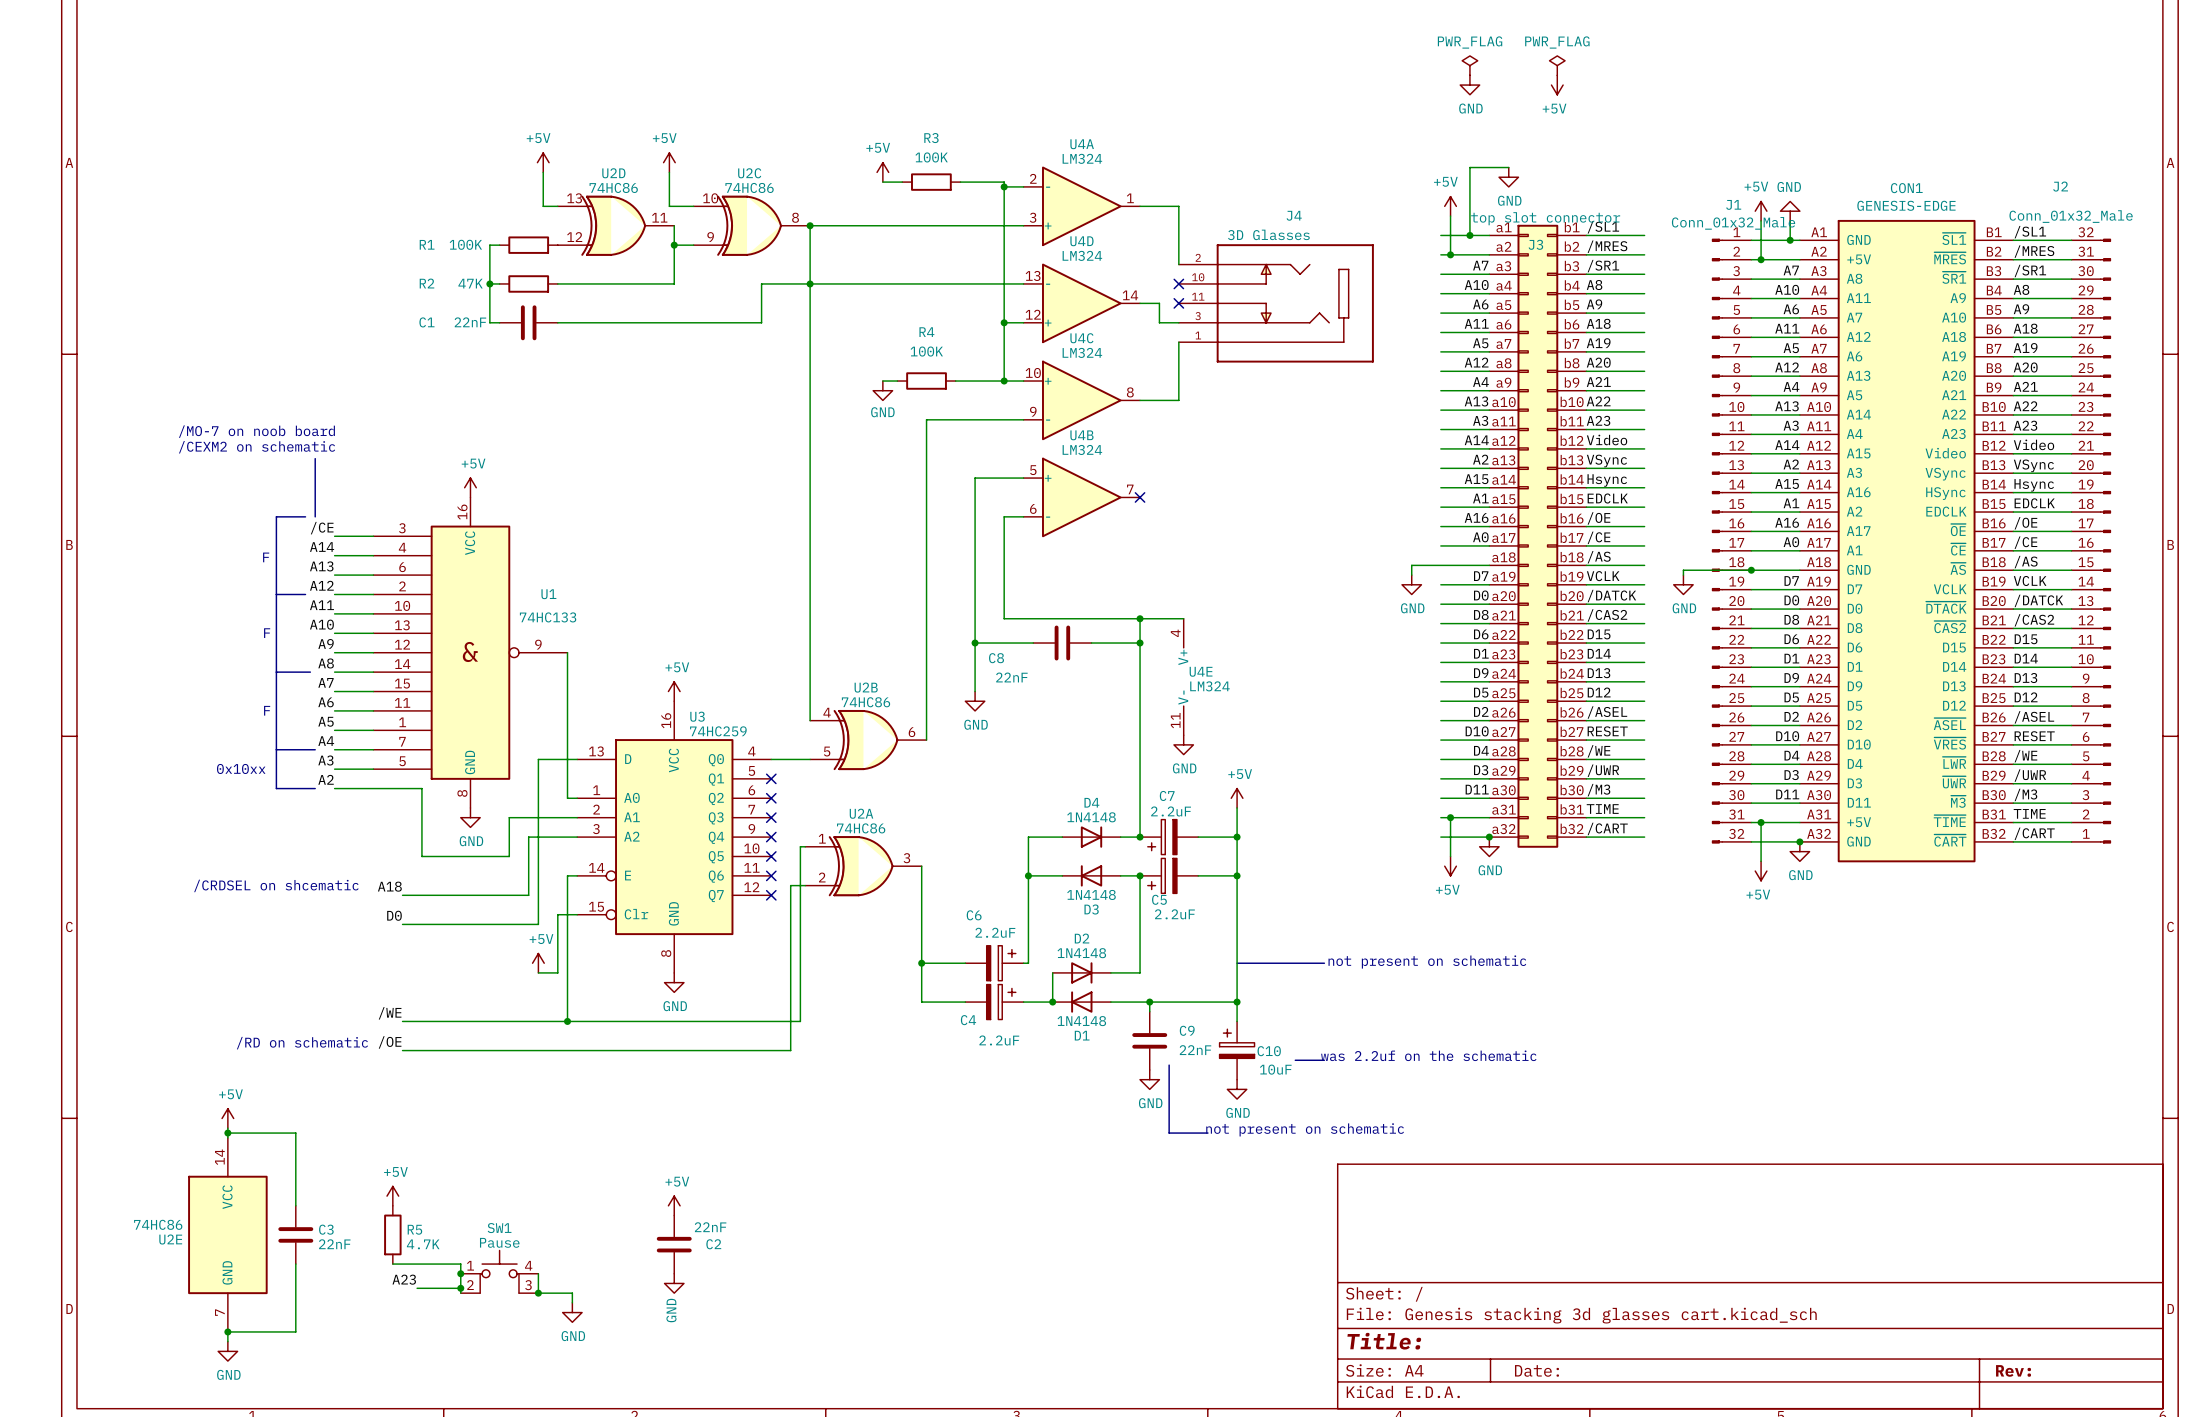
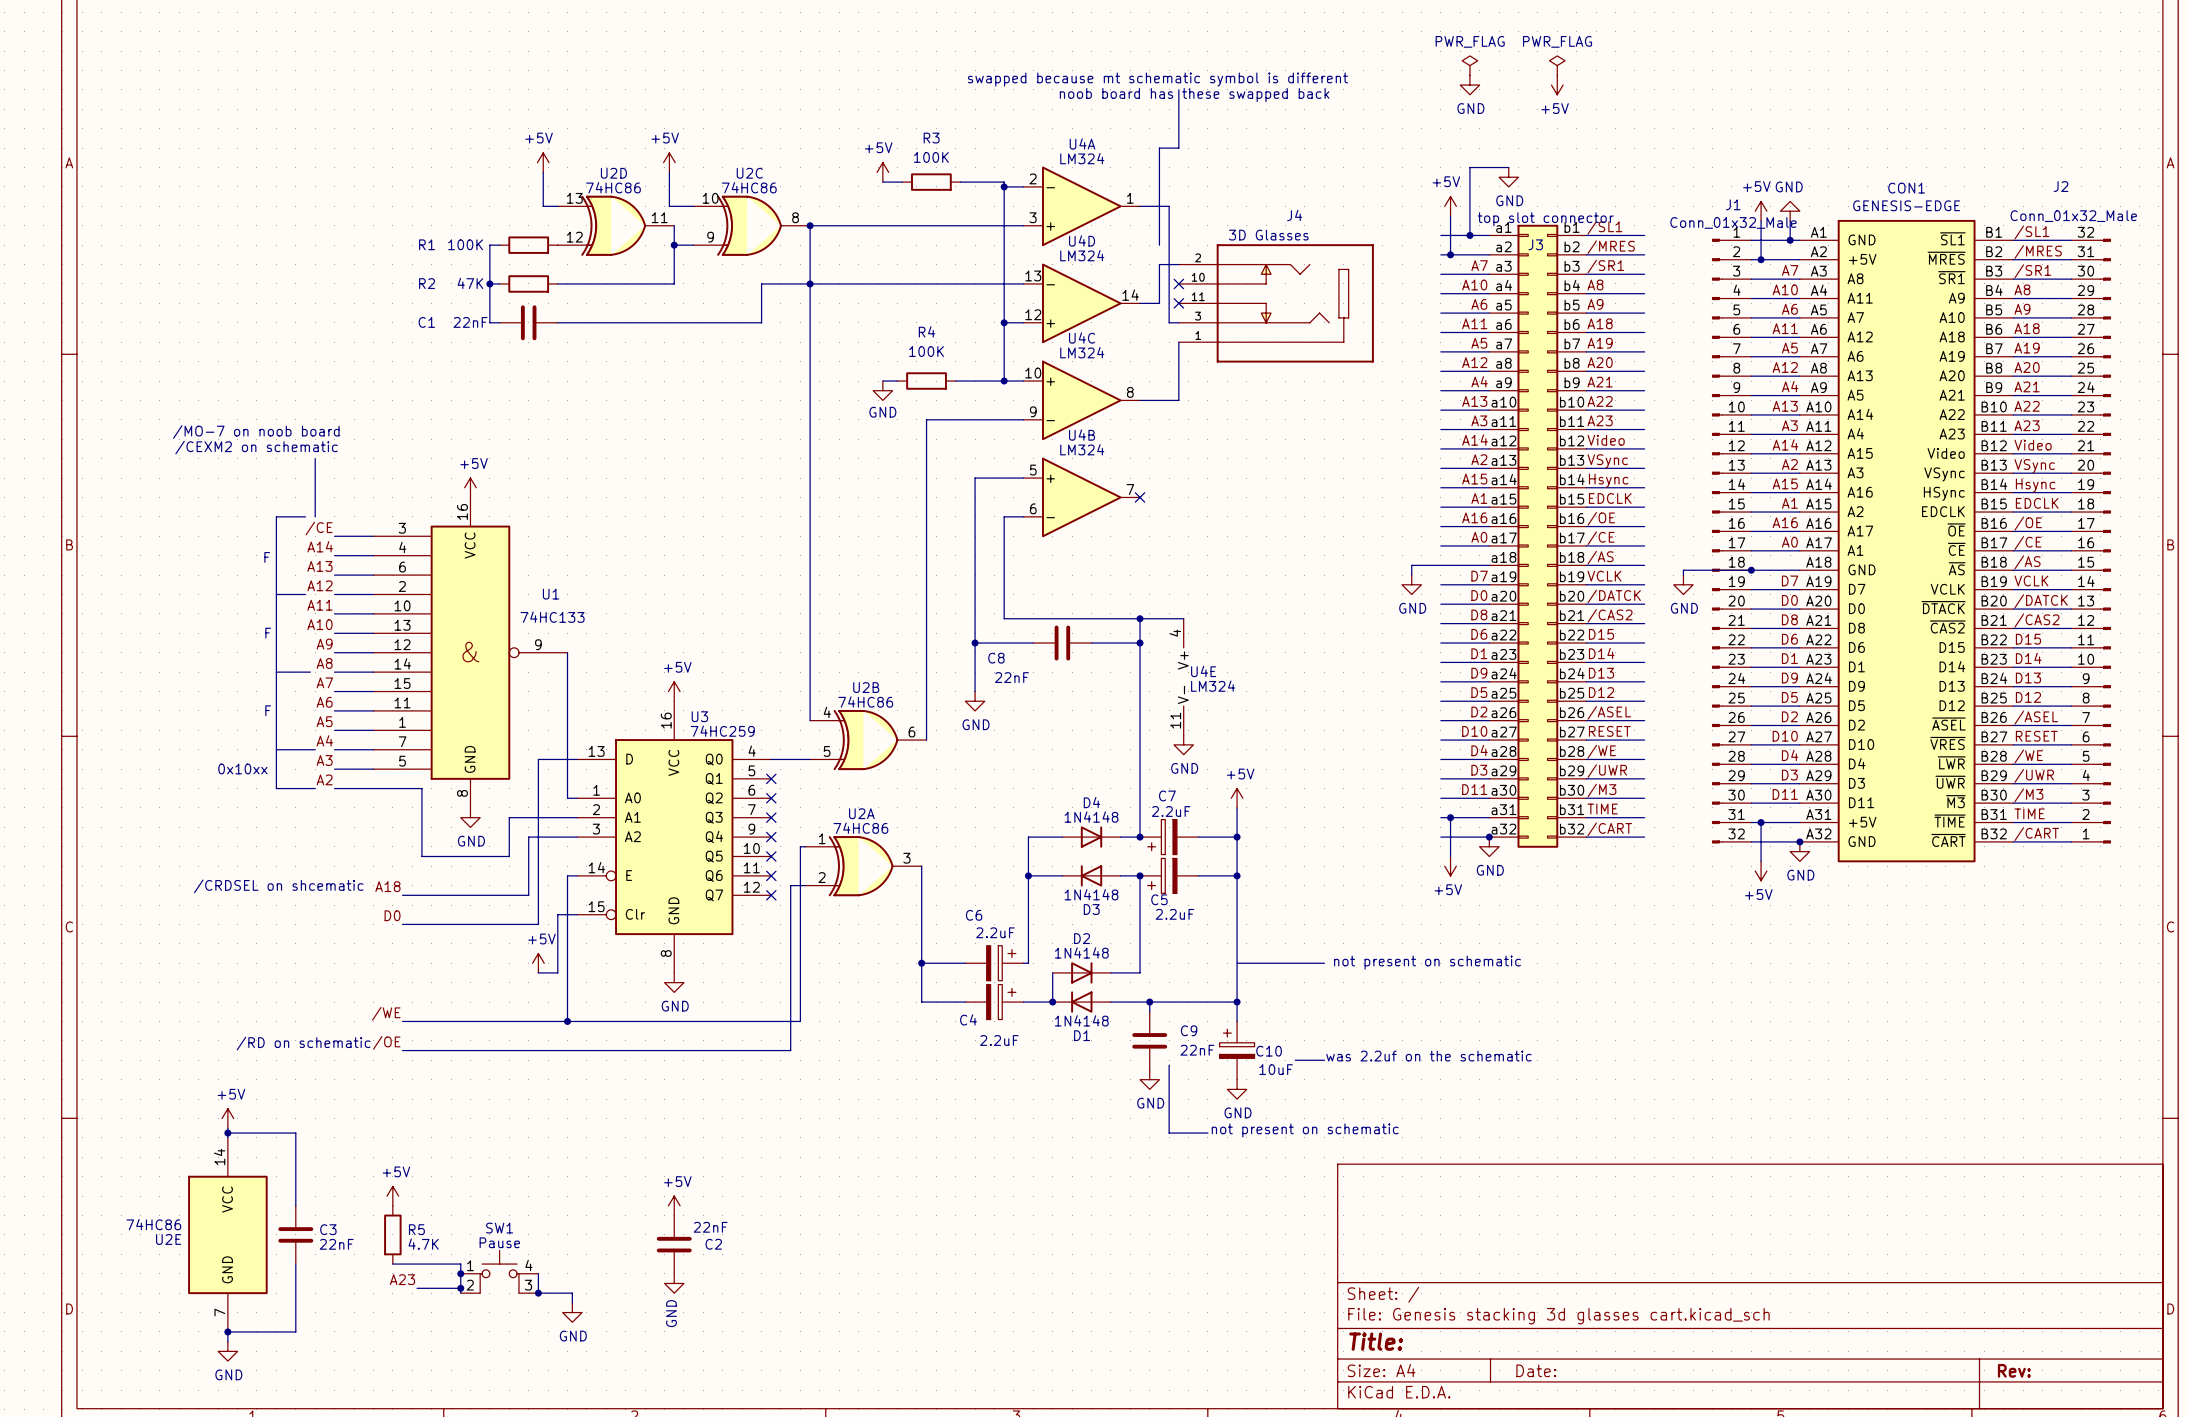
text: none -> swapped because mt schematic symbol is different (1157, 79)
line: none -> (1178, 89) (1178, 148) (1159, 148) (1159, 245)
text: none -> noob board has these swapped back (1194, 95)
wire: (1169, 206) (1178, 206) (1178, 264) -> (1169, 206) (1169, 322)
wire: (1159, 303) (1159, 322) (1169, 322) -> (1159, 303) (1159, 264) (1178, 264)

